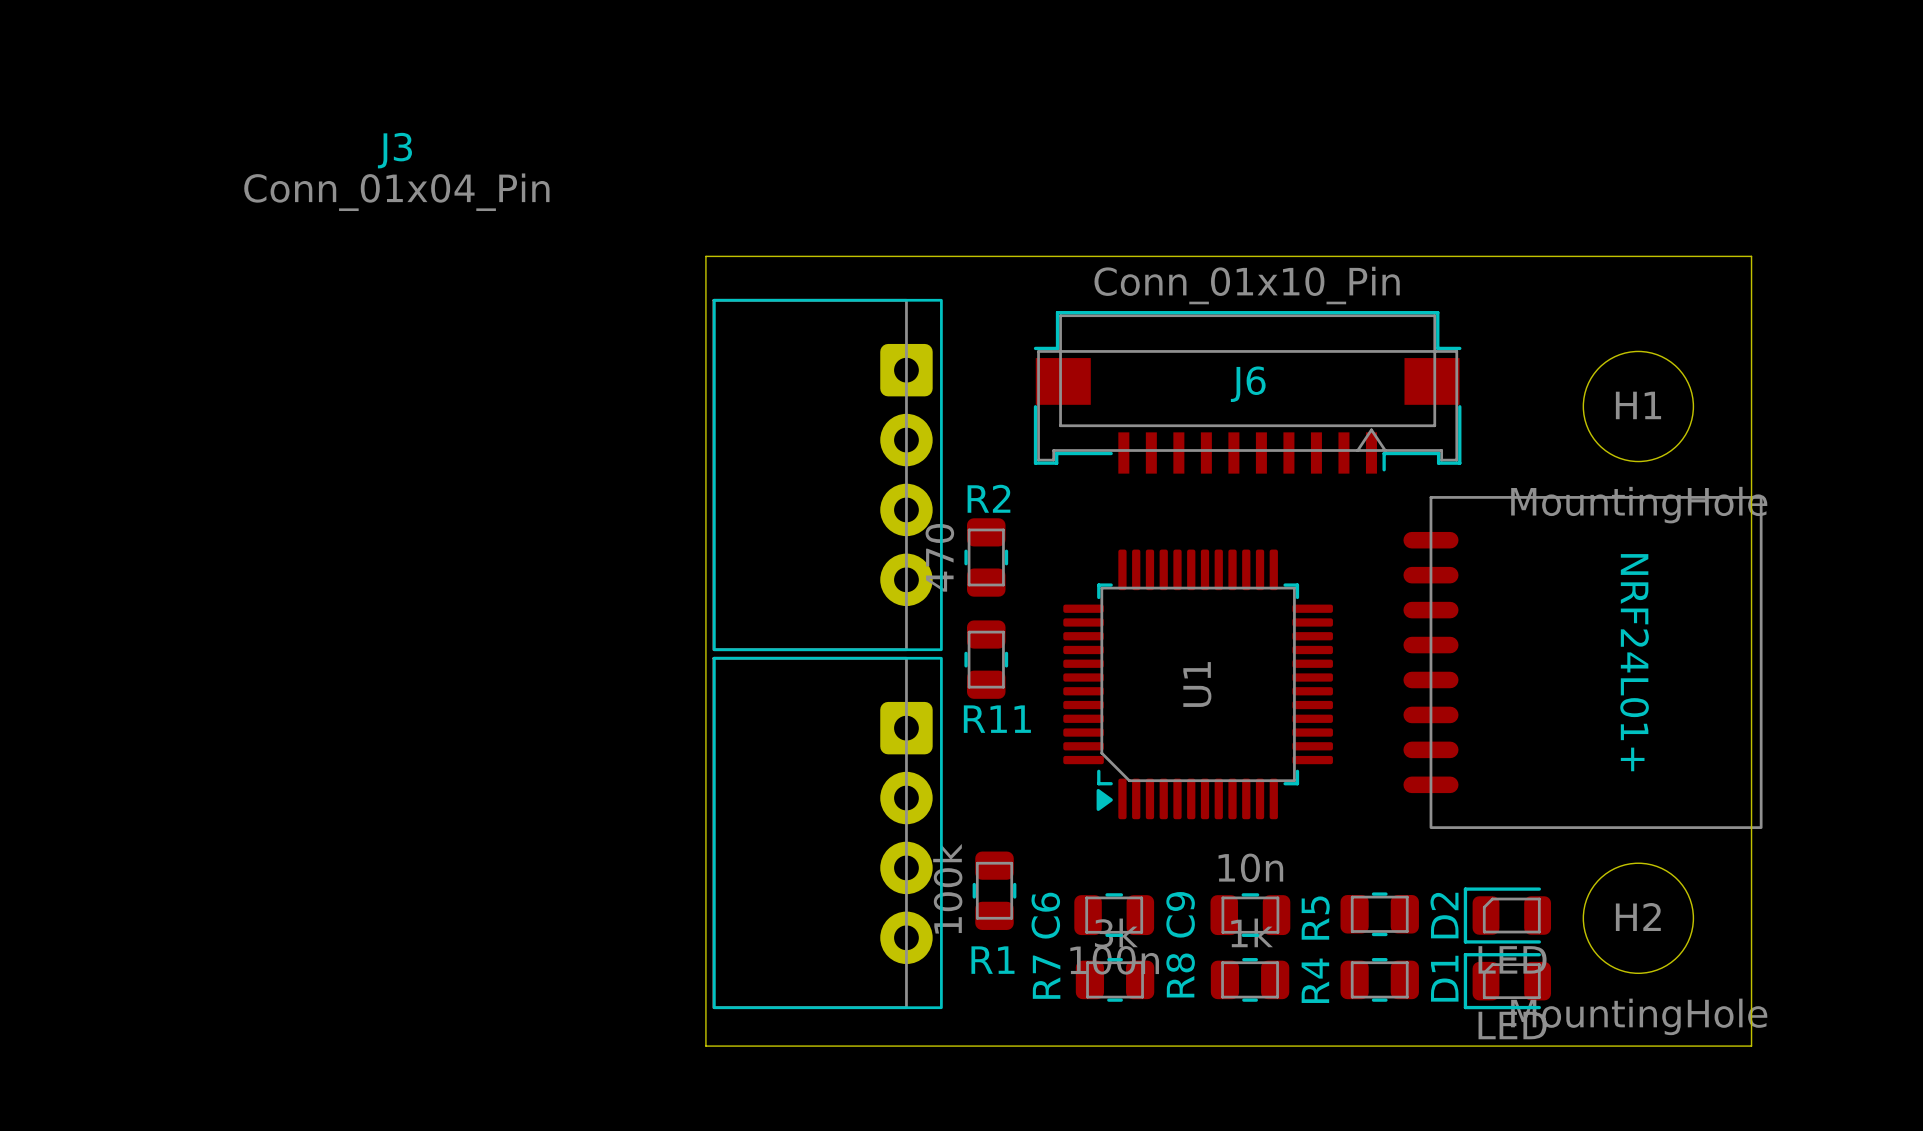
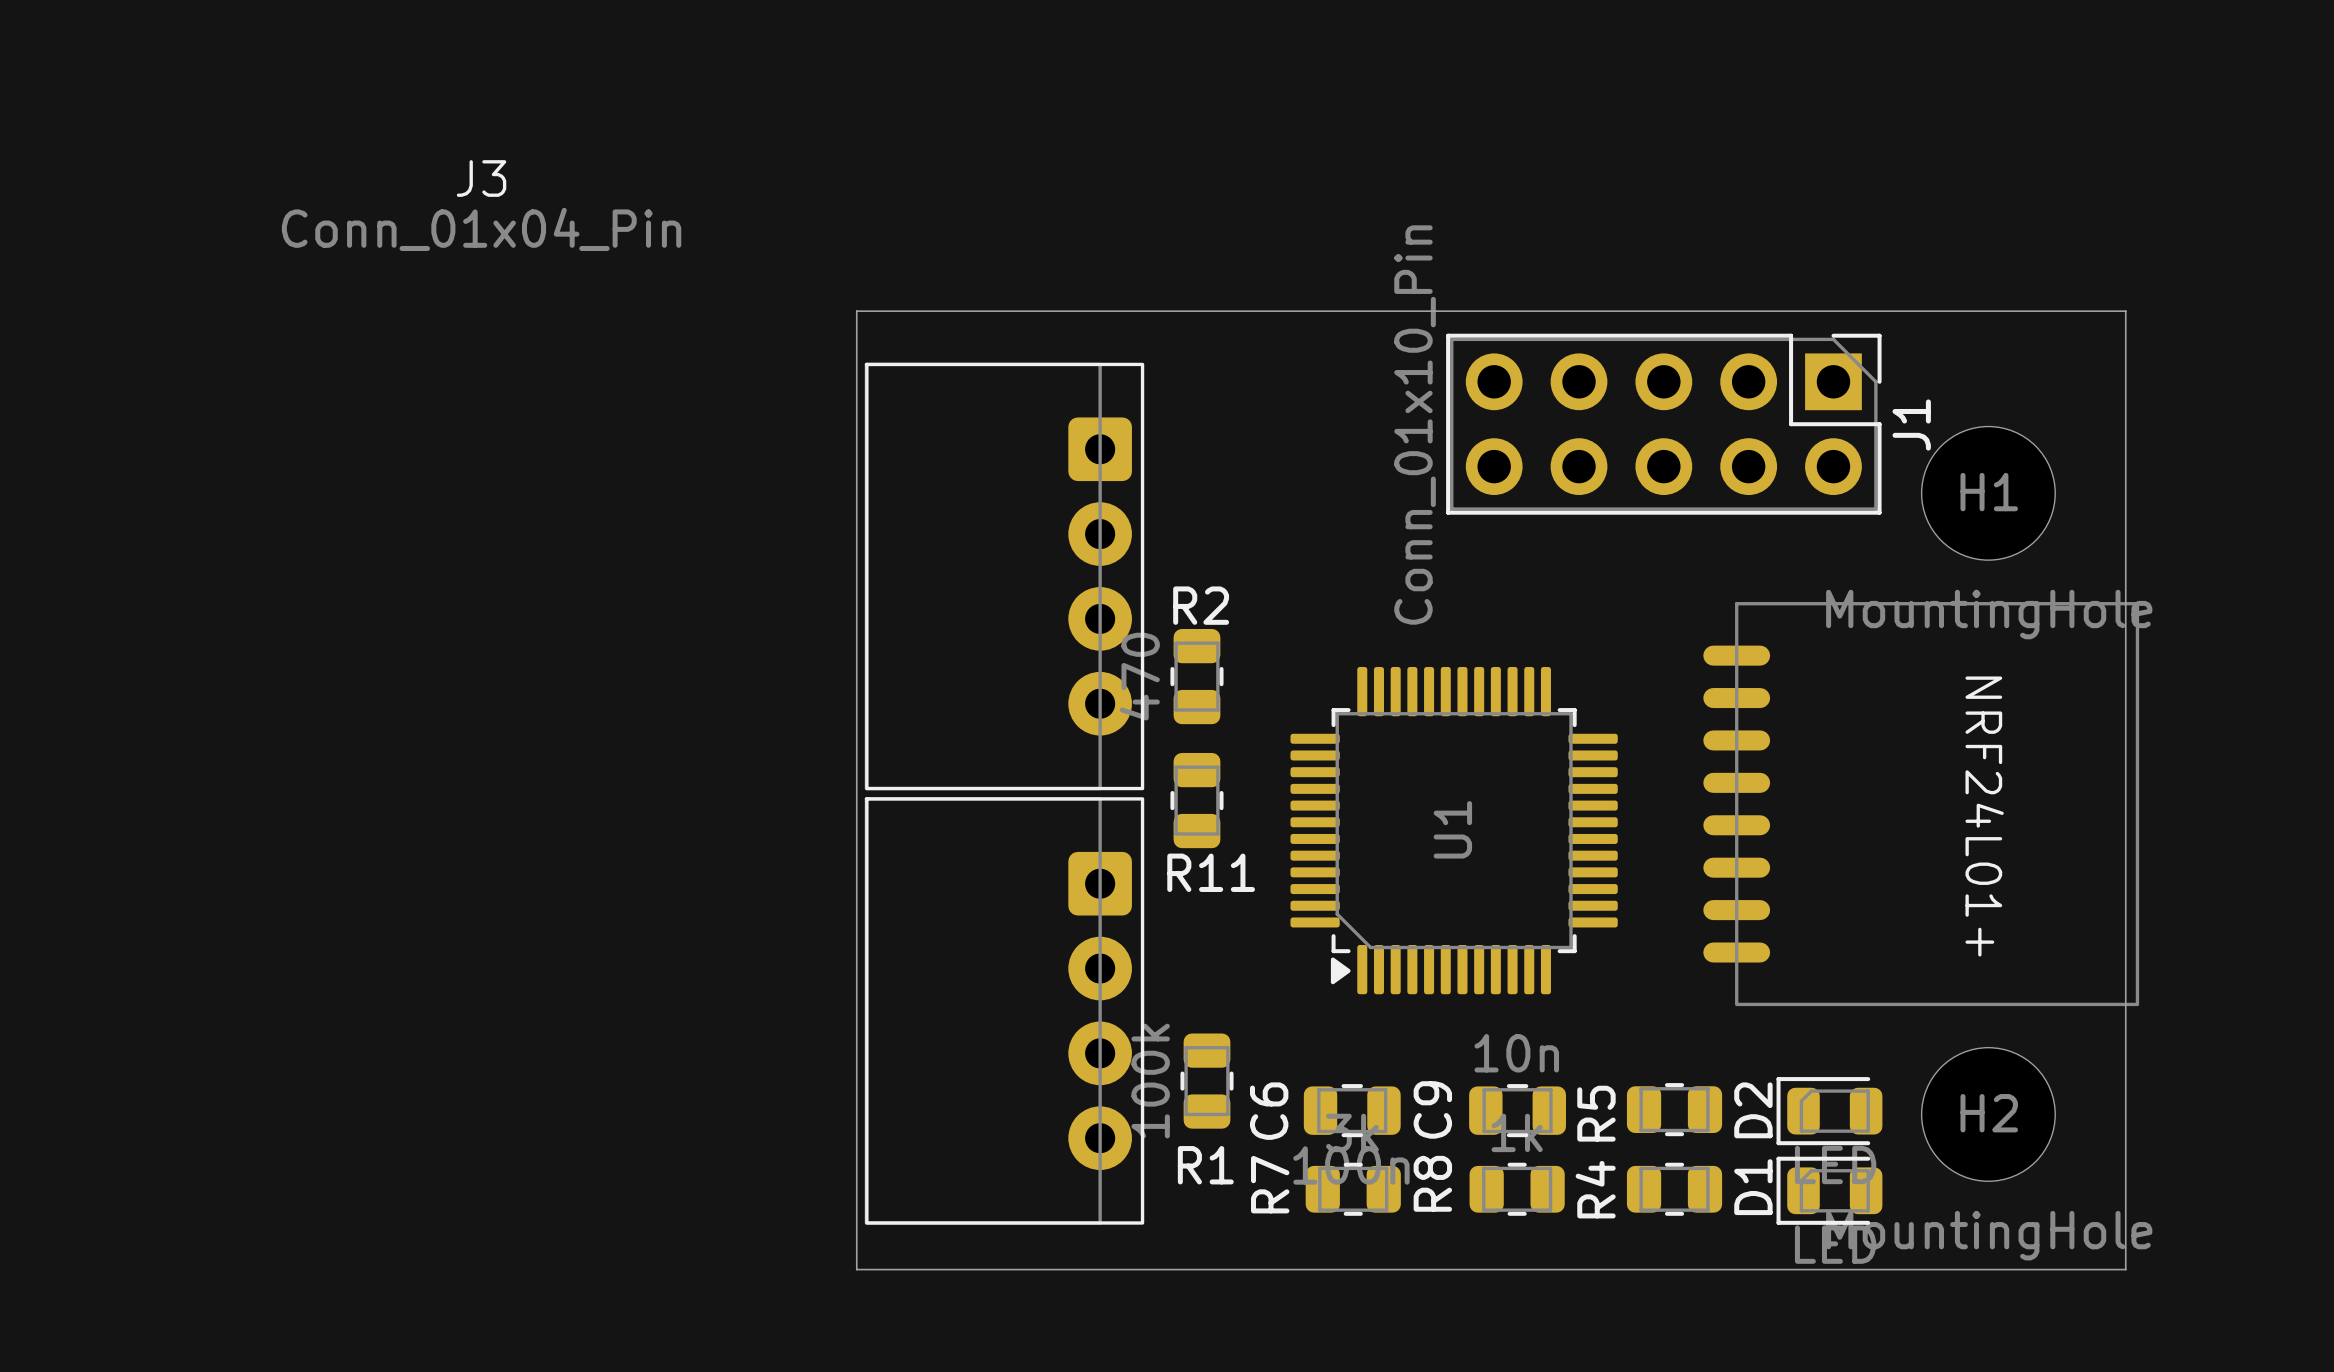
J1: none -> Conn_01x10_Pin (1663, 424)
J6: Conn_01x10_Pin (1247, 392) -> none

